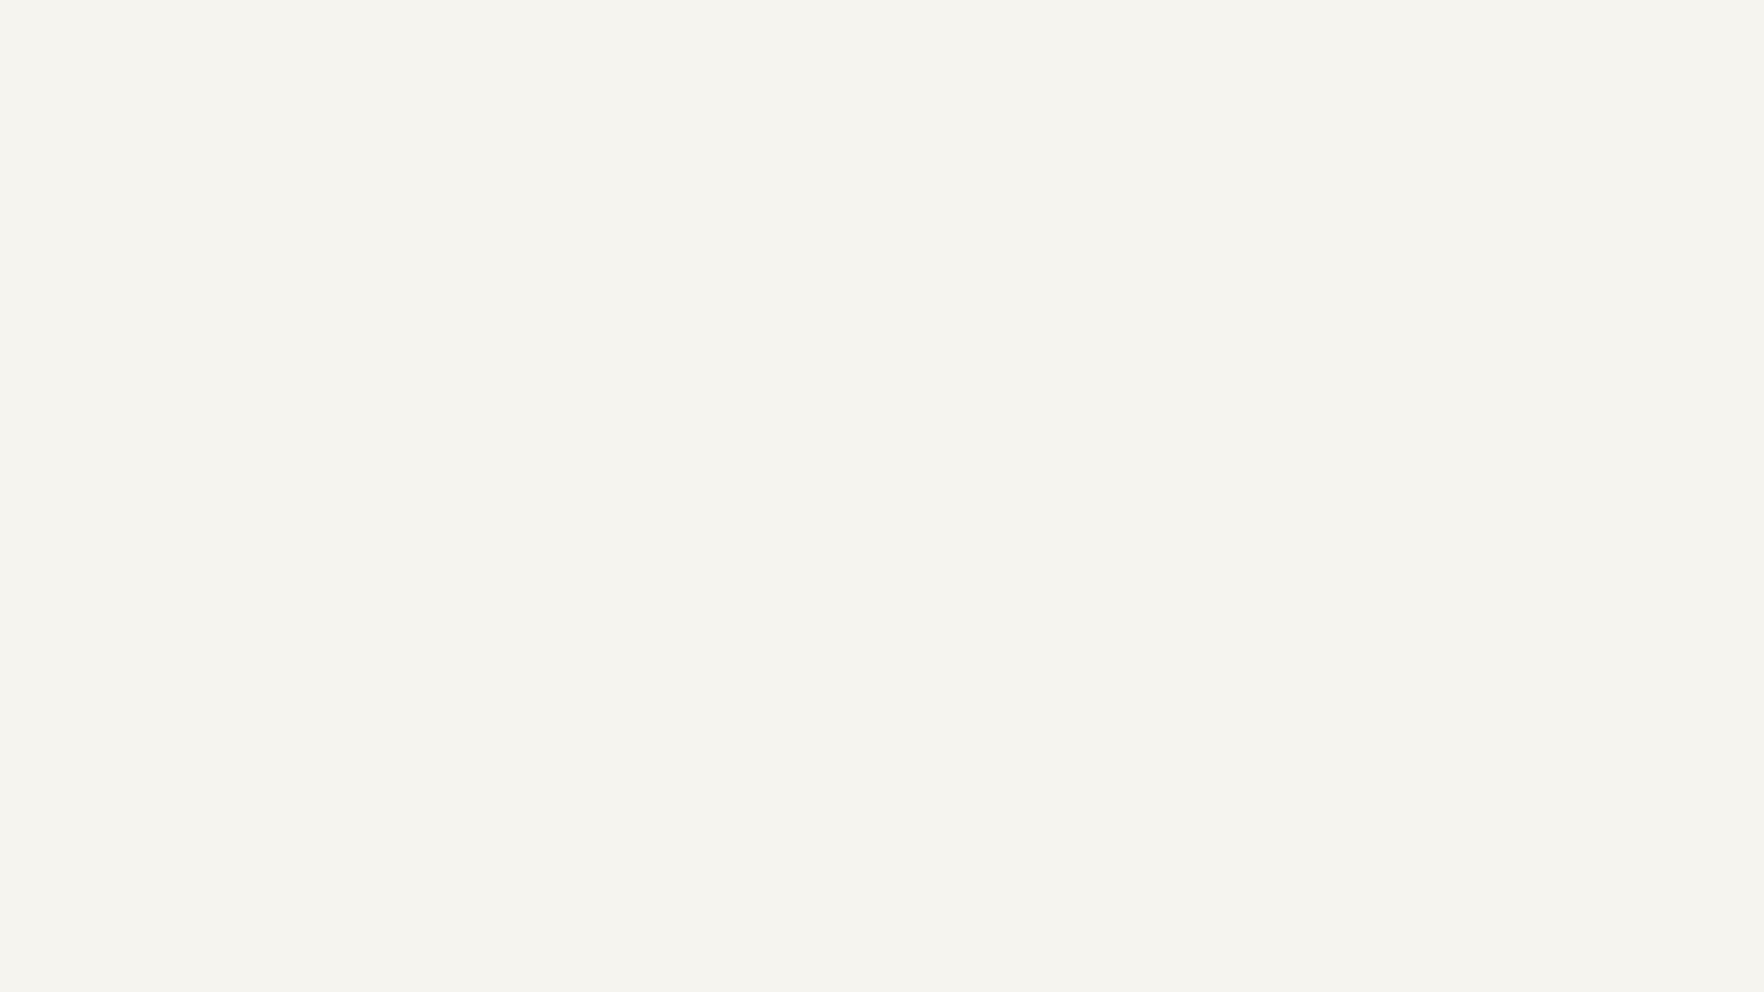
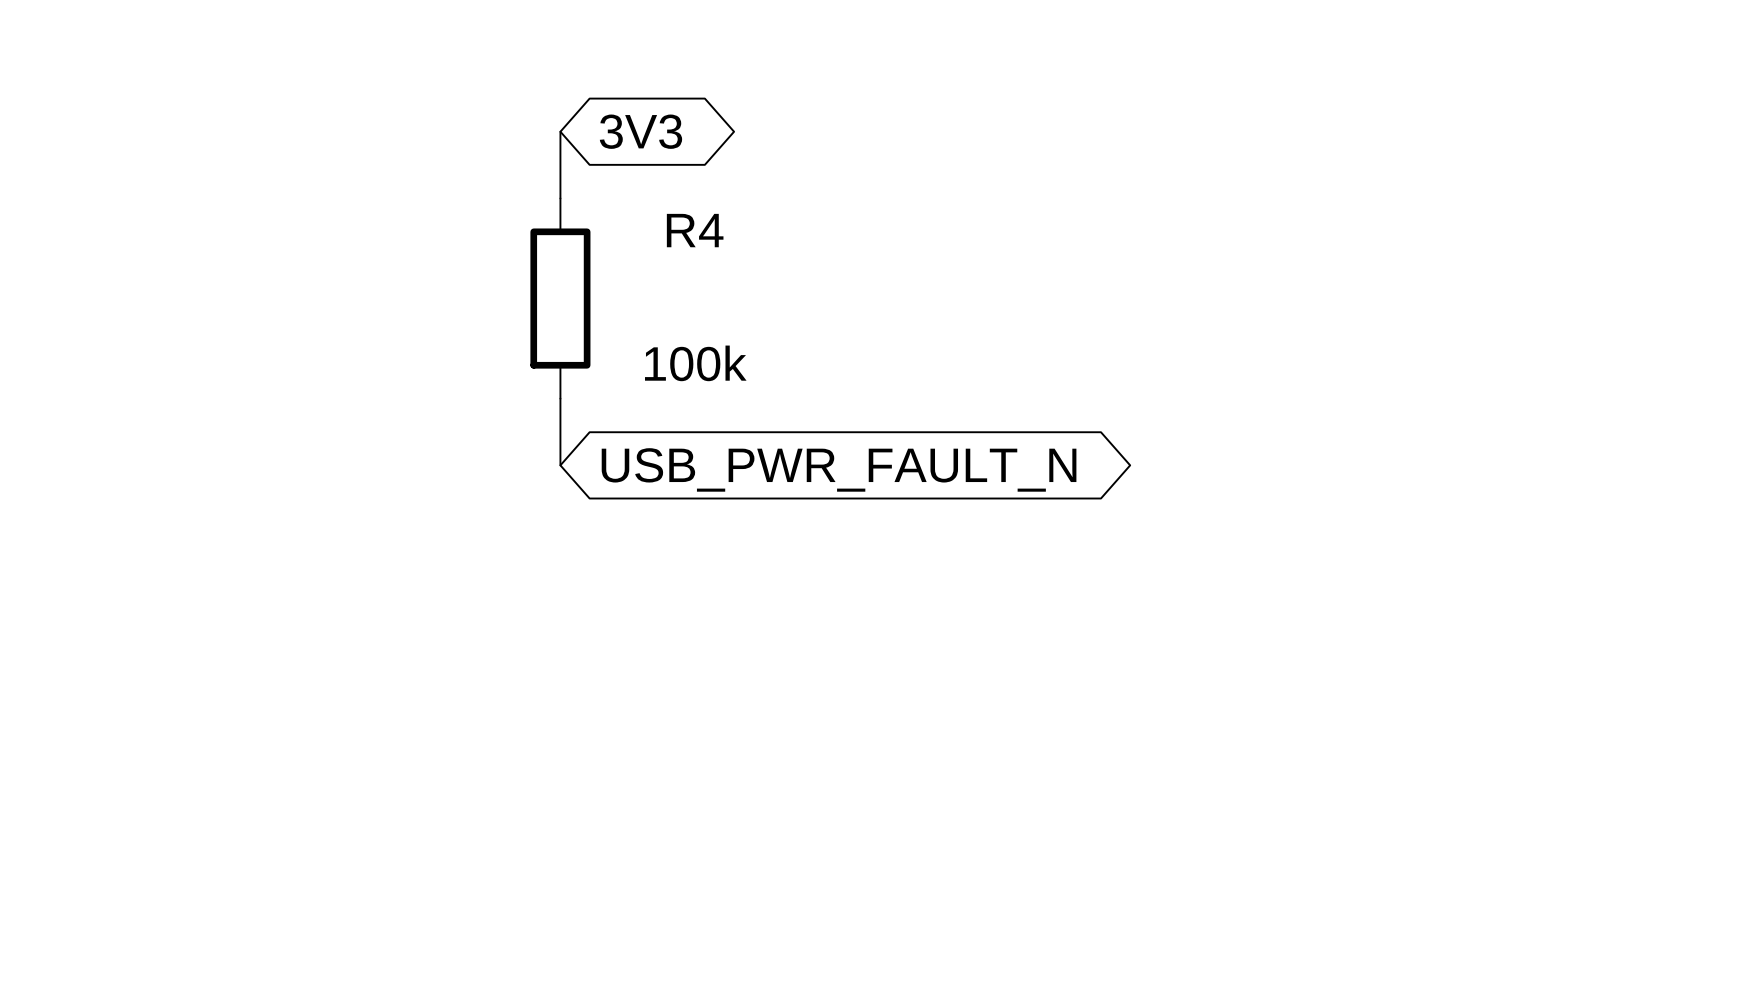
wire: none -> (560, 131) (560, 198)
global label: none -> 3V3 (640, 131)
R4: none -> 100k (560, 298)
wire: none -> (560, 398) (560, 465)
global label: none -> USB_PWR_FAULT_N (839, 469)

